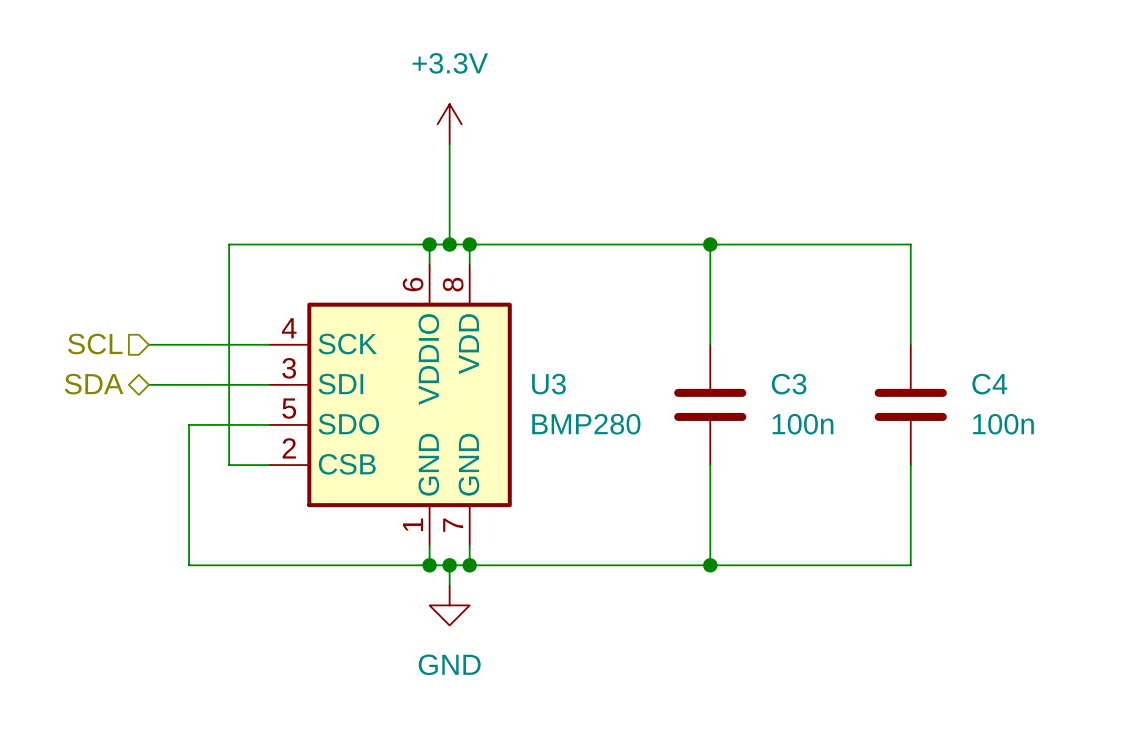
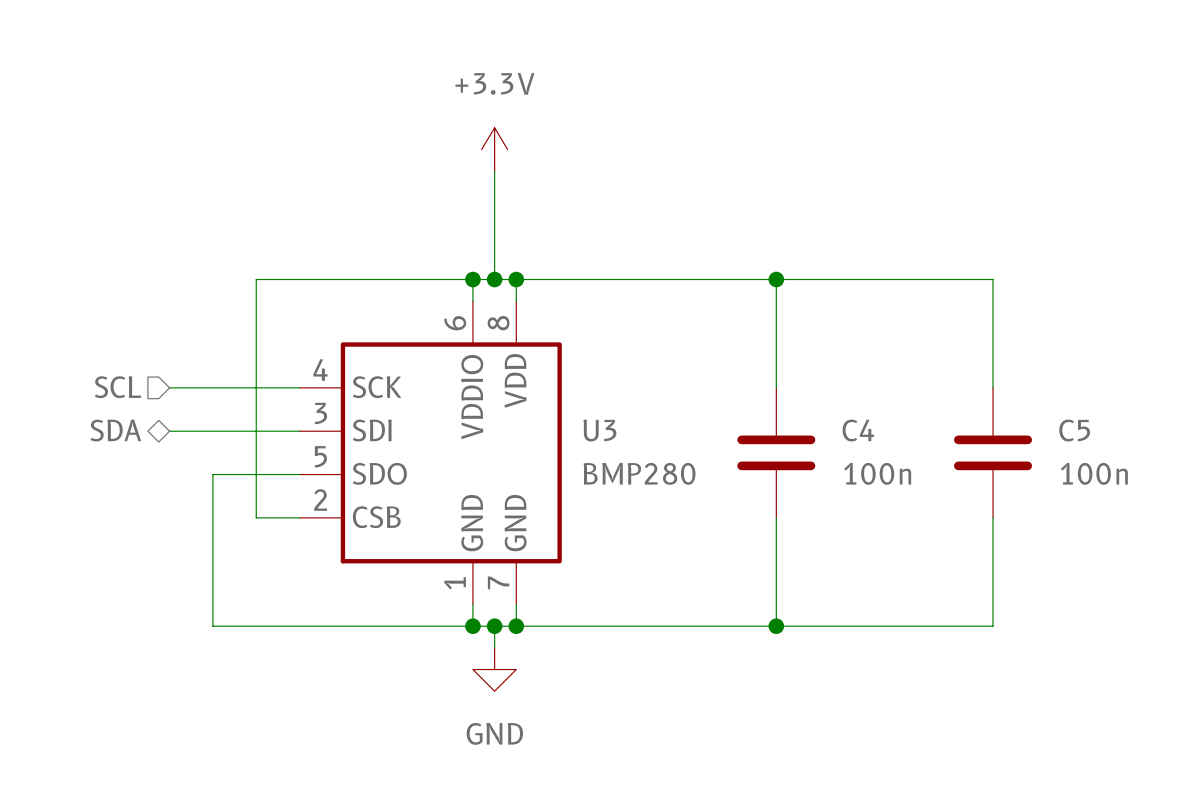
C3 name: C3 (789, 384) -> C4 (858, 430)
C4 name: C4 (989, 384) -> C5 (1074, 430)

